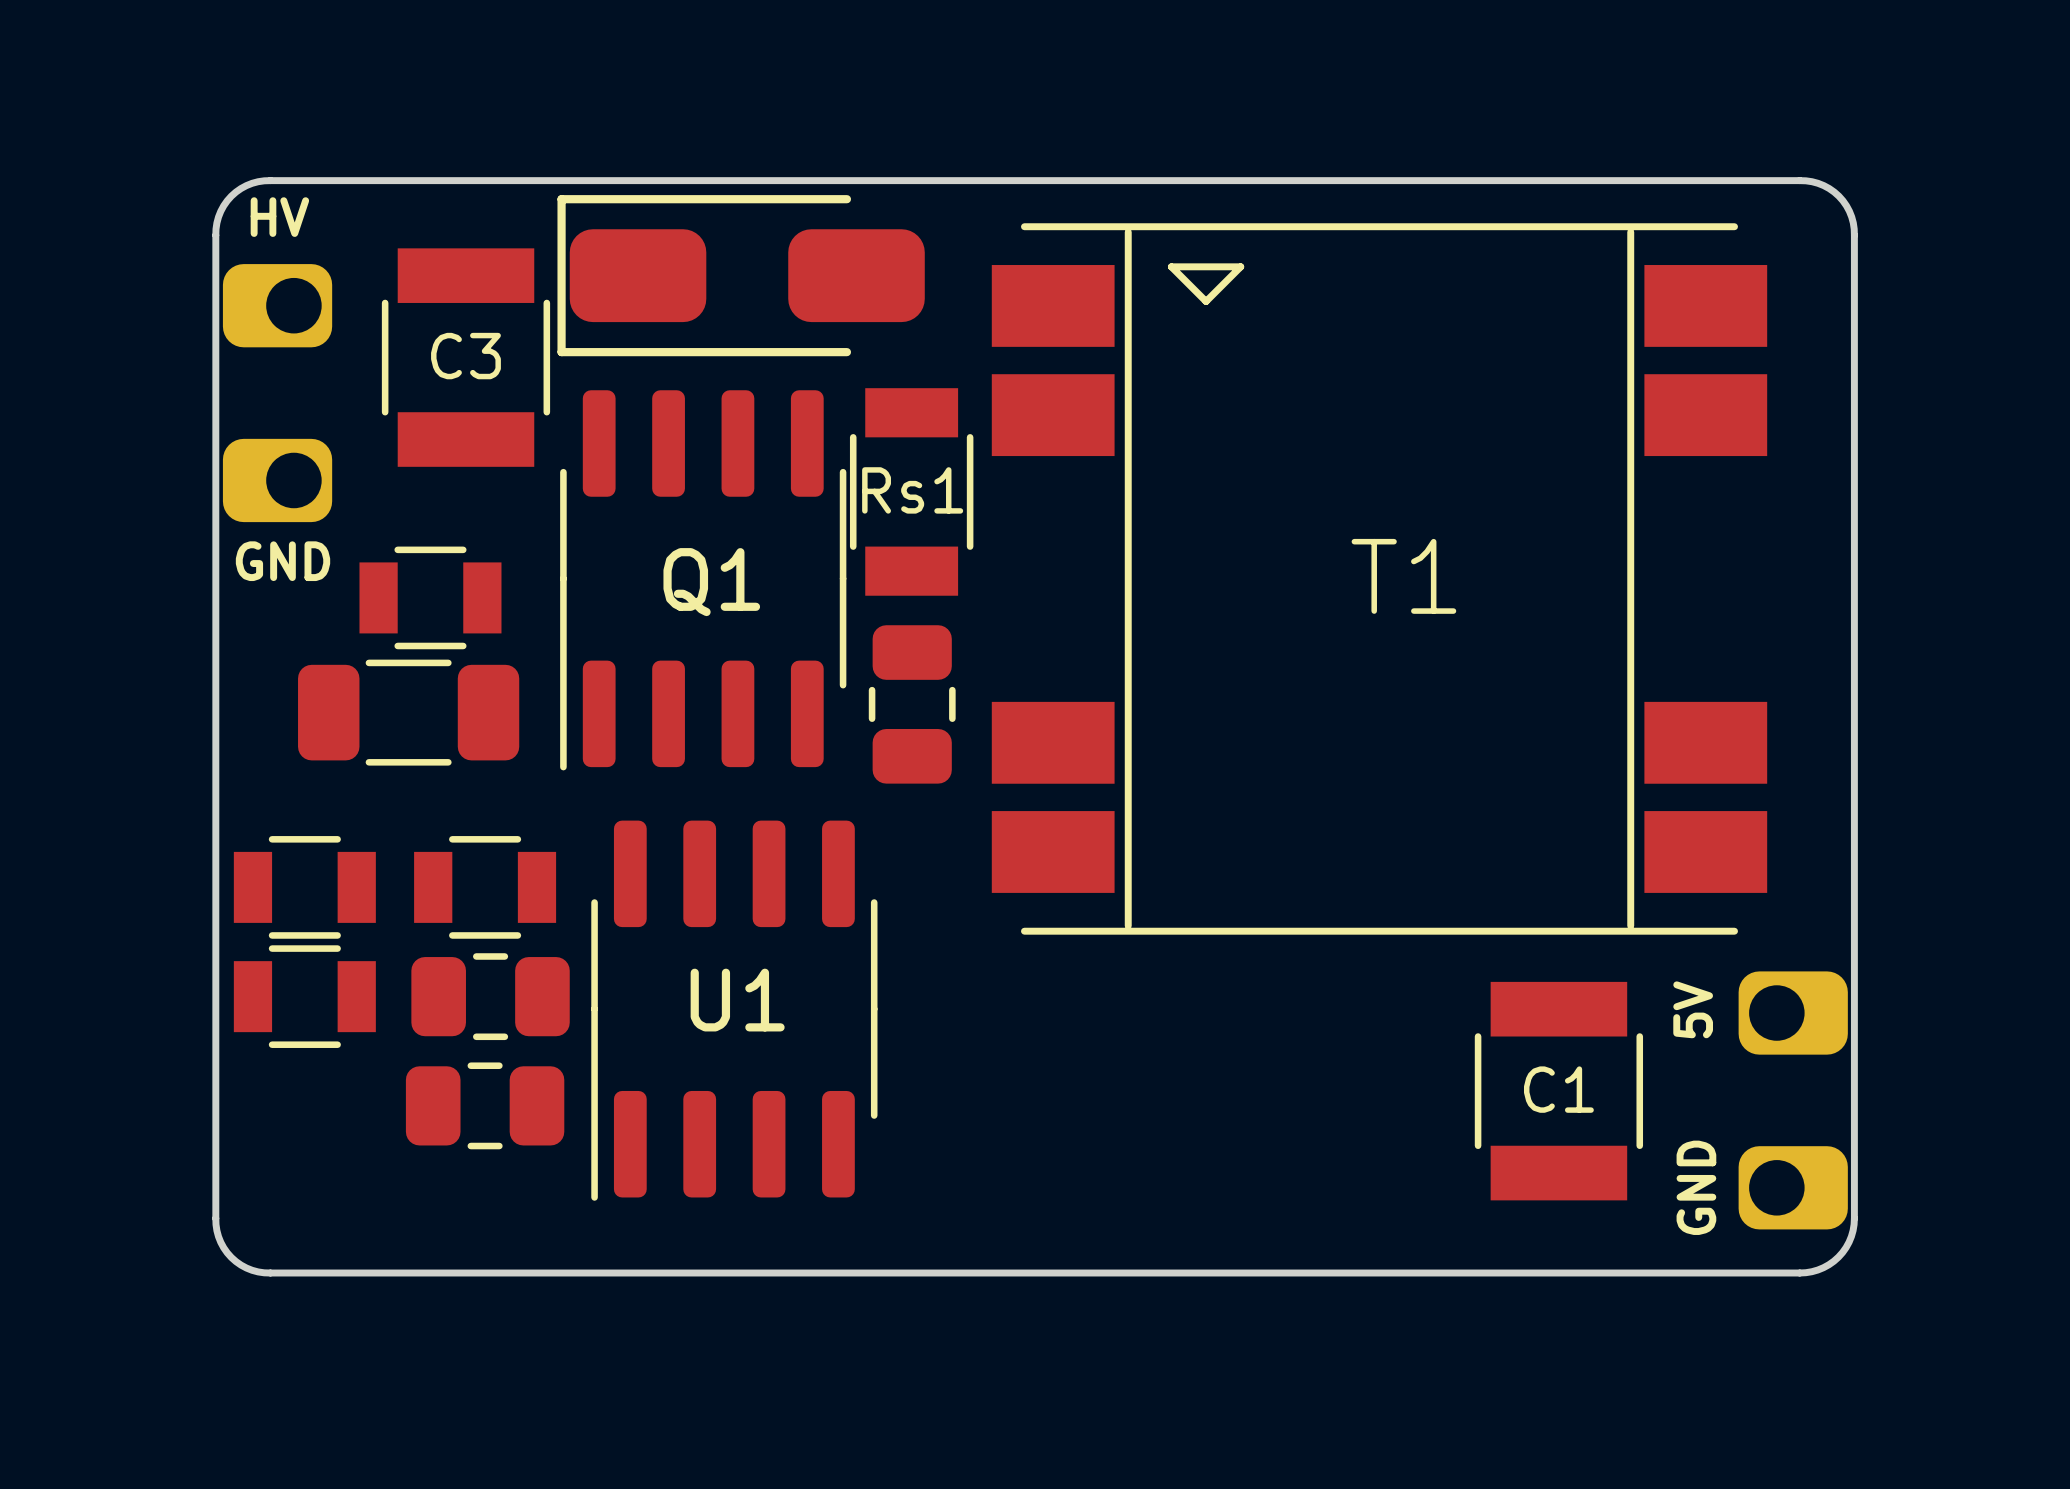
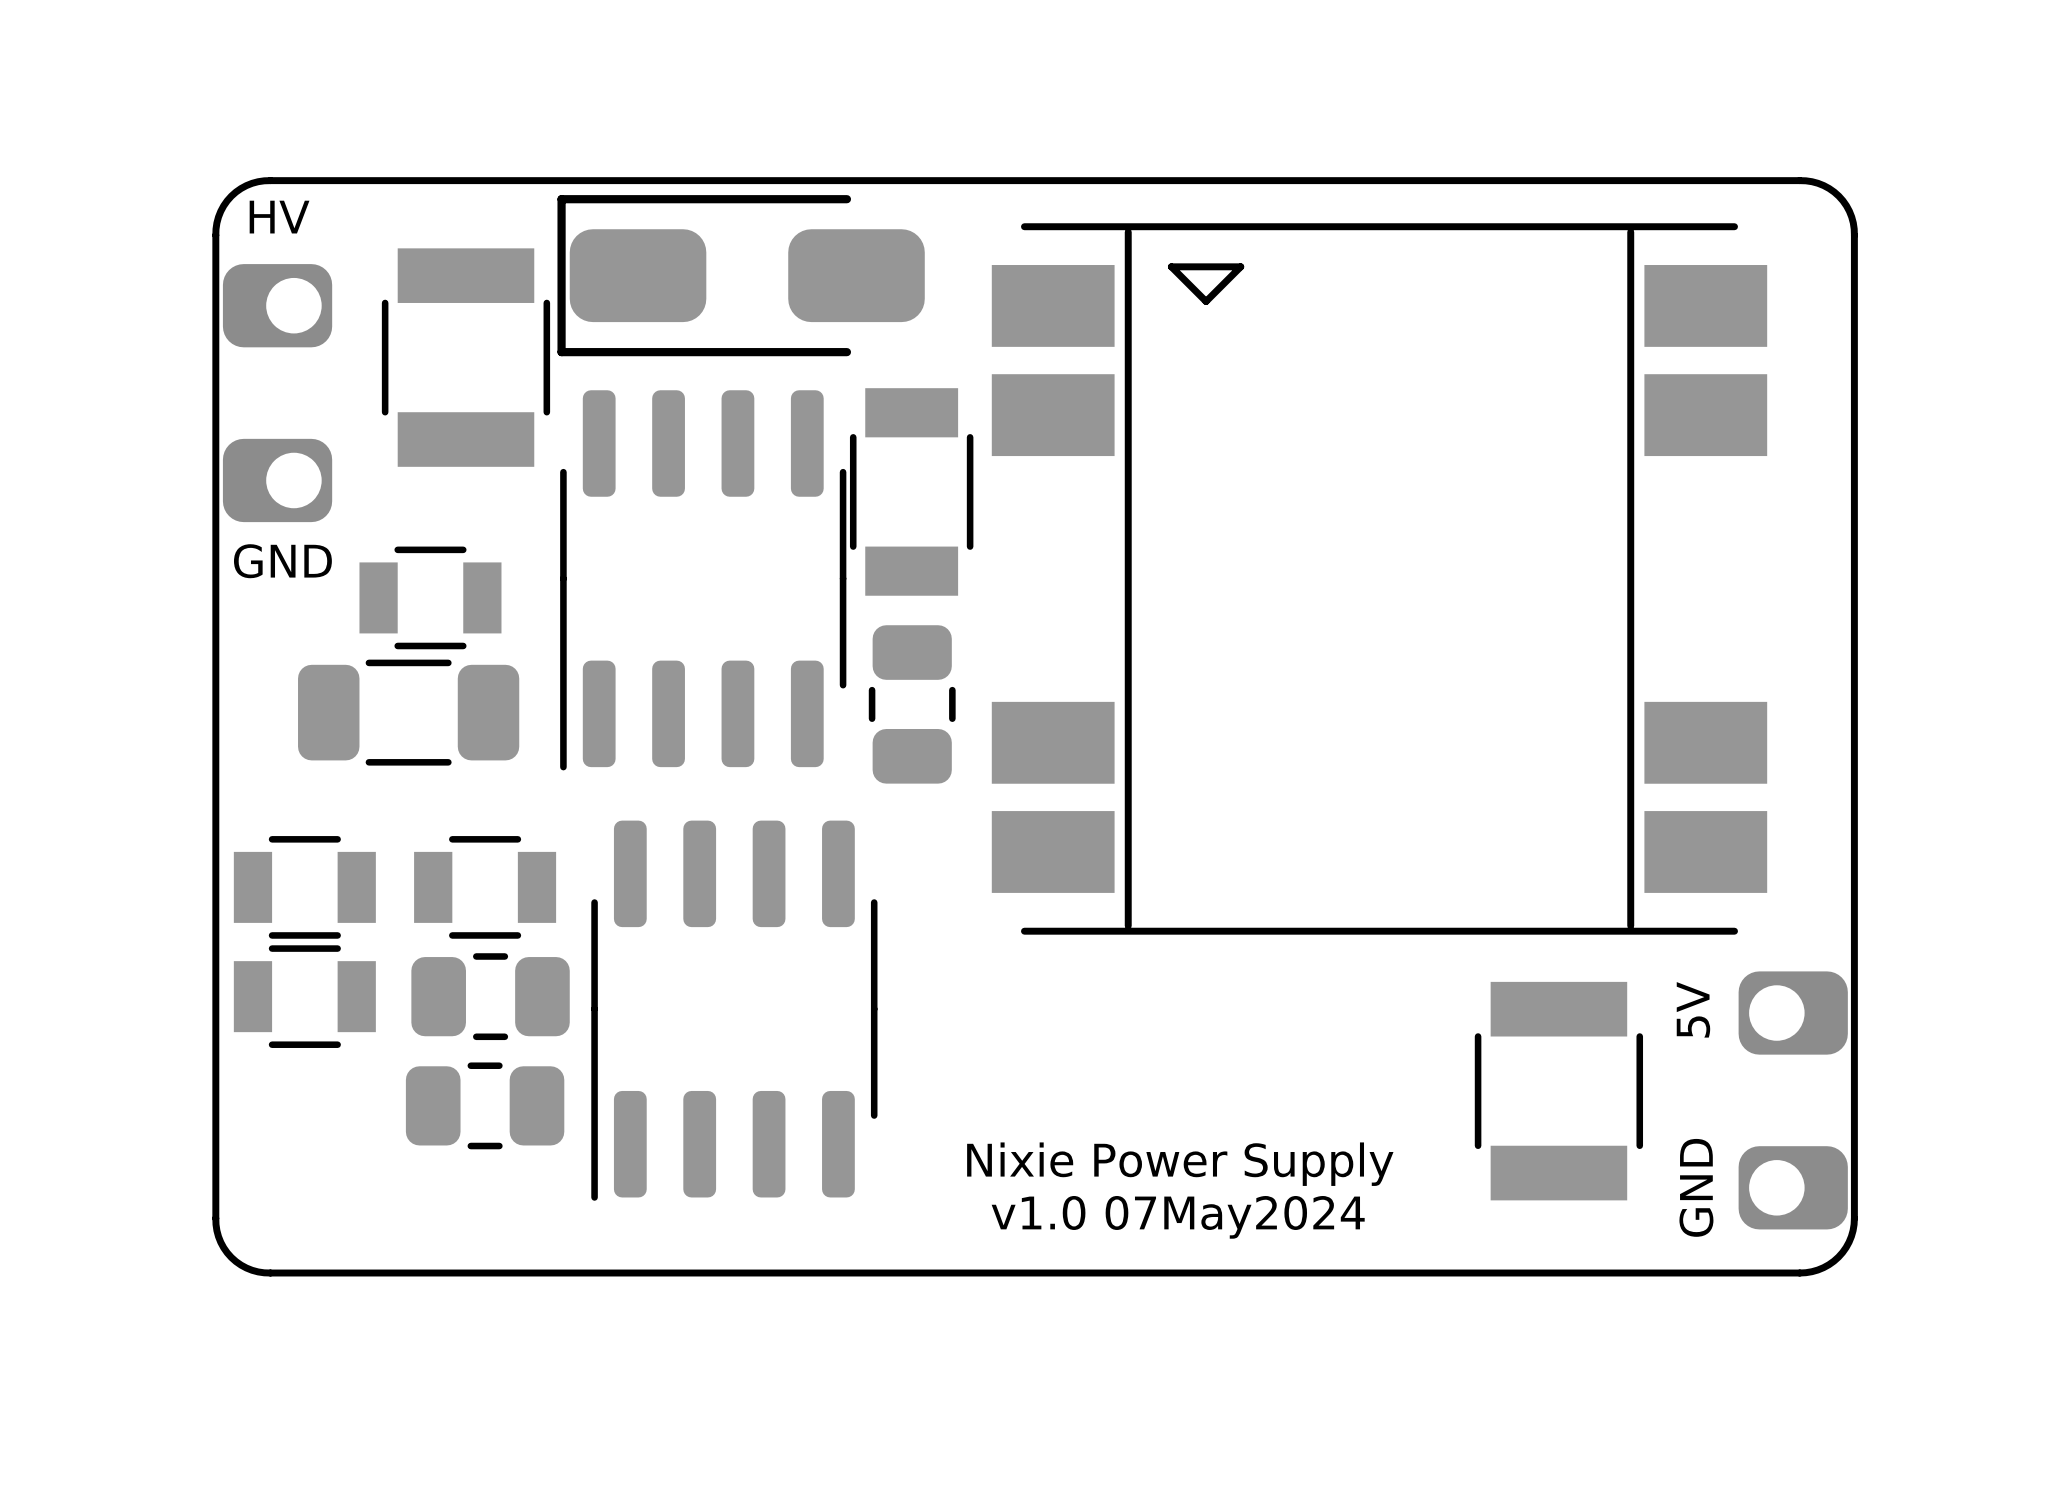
C3 name: C3 (465, 356) -> none
Rs1 name: Rs1 (912, 490) -> none
T1 name: T1 (1403, 576) -> none
Q1 name: Q1 (711, 582) -> none
U1 name: U1 (737, 1000) -> none
C1 name: C1 (1558, 1089) -> none
text: none -> Nixie Power Supply (1180, 1164)
text: none -> v1.0 07May2024 (1178, 1217)

